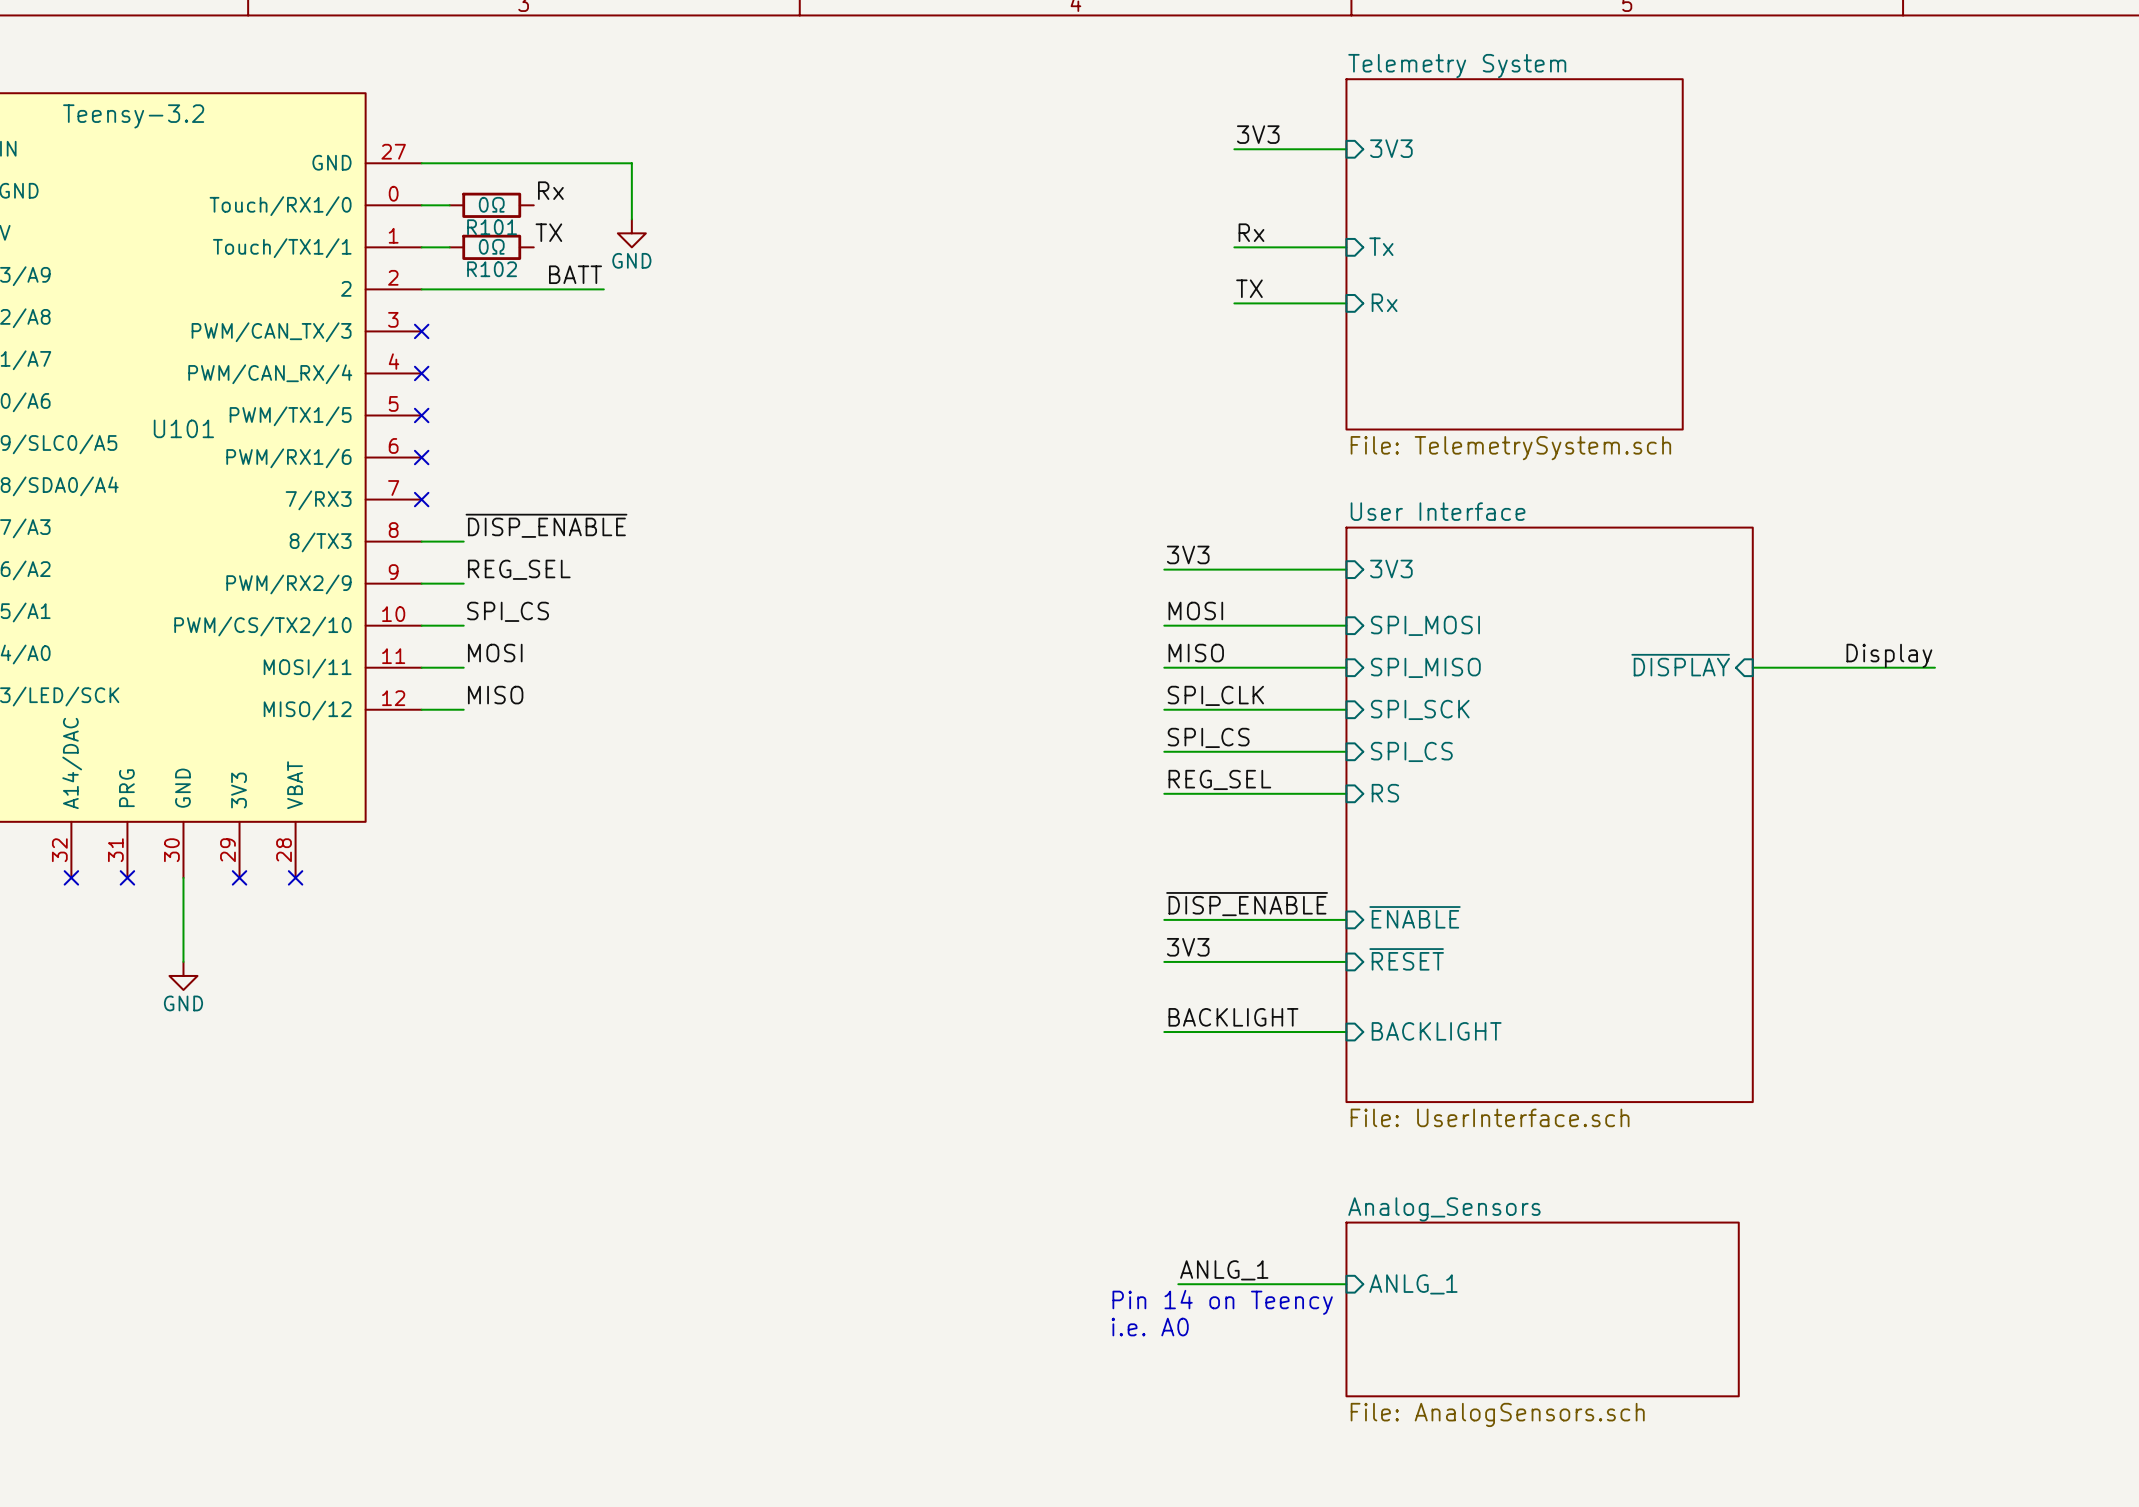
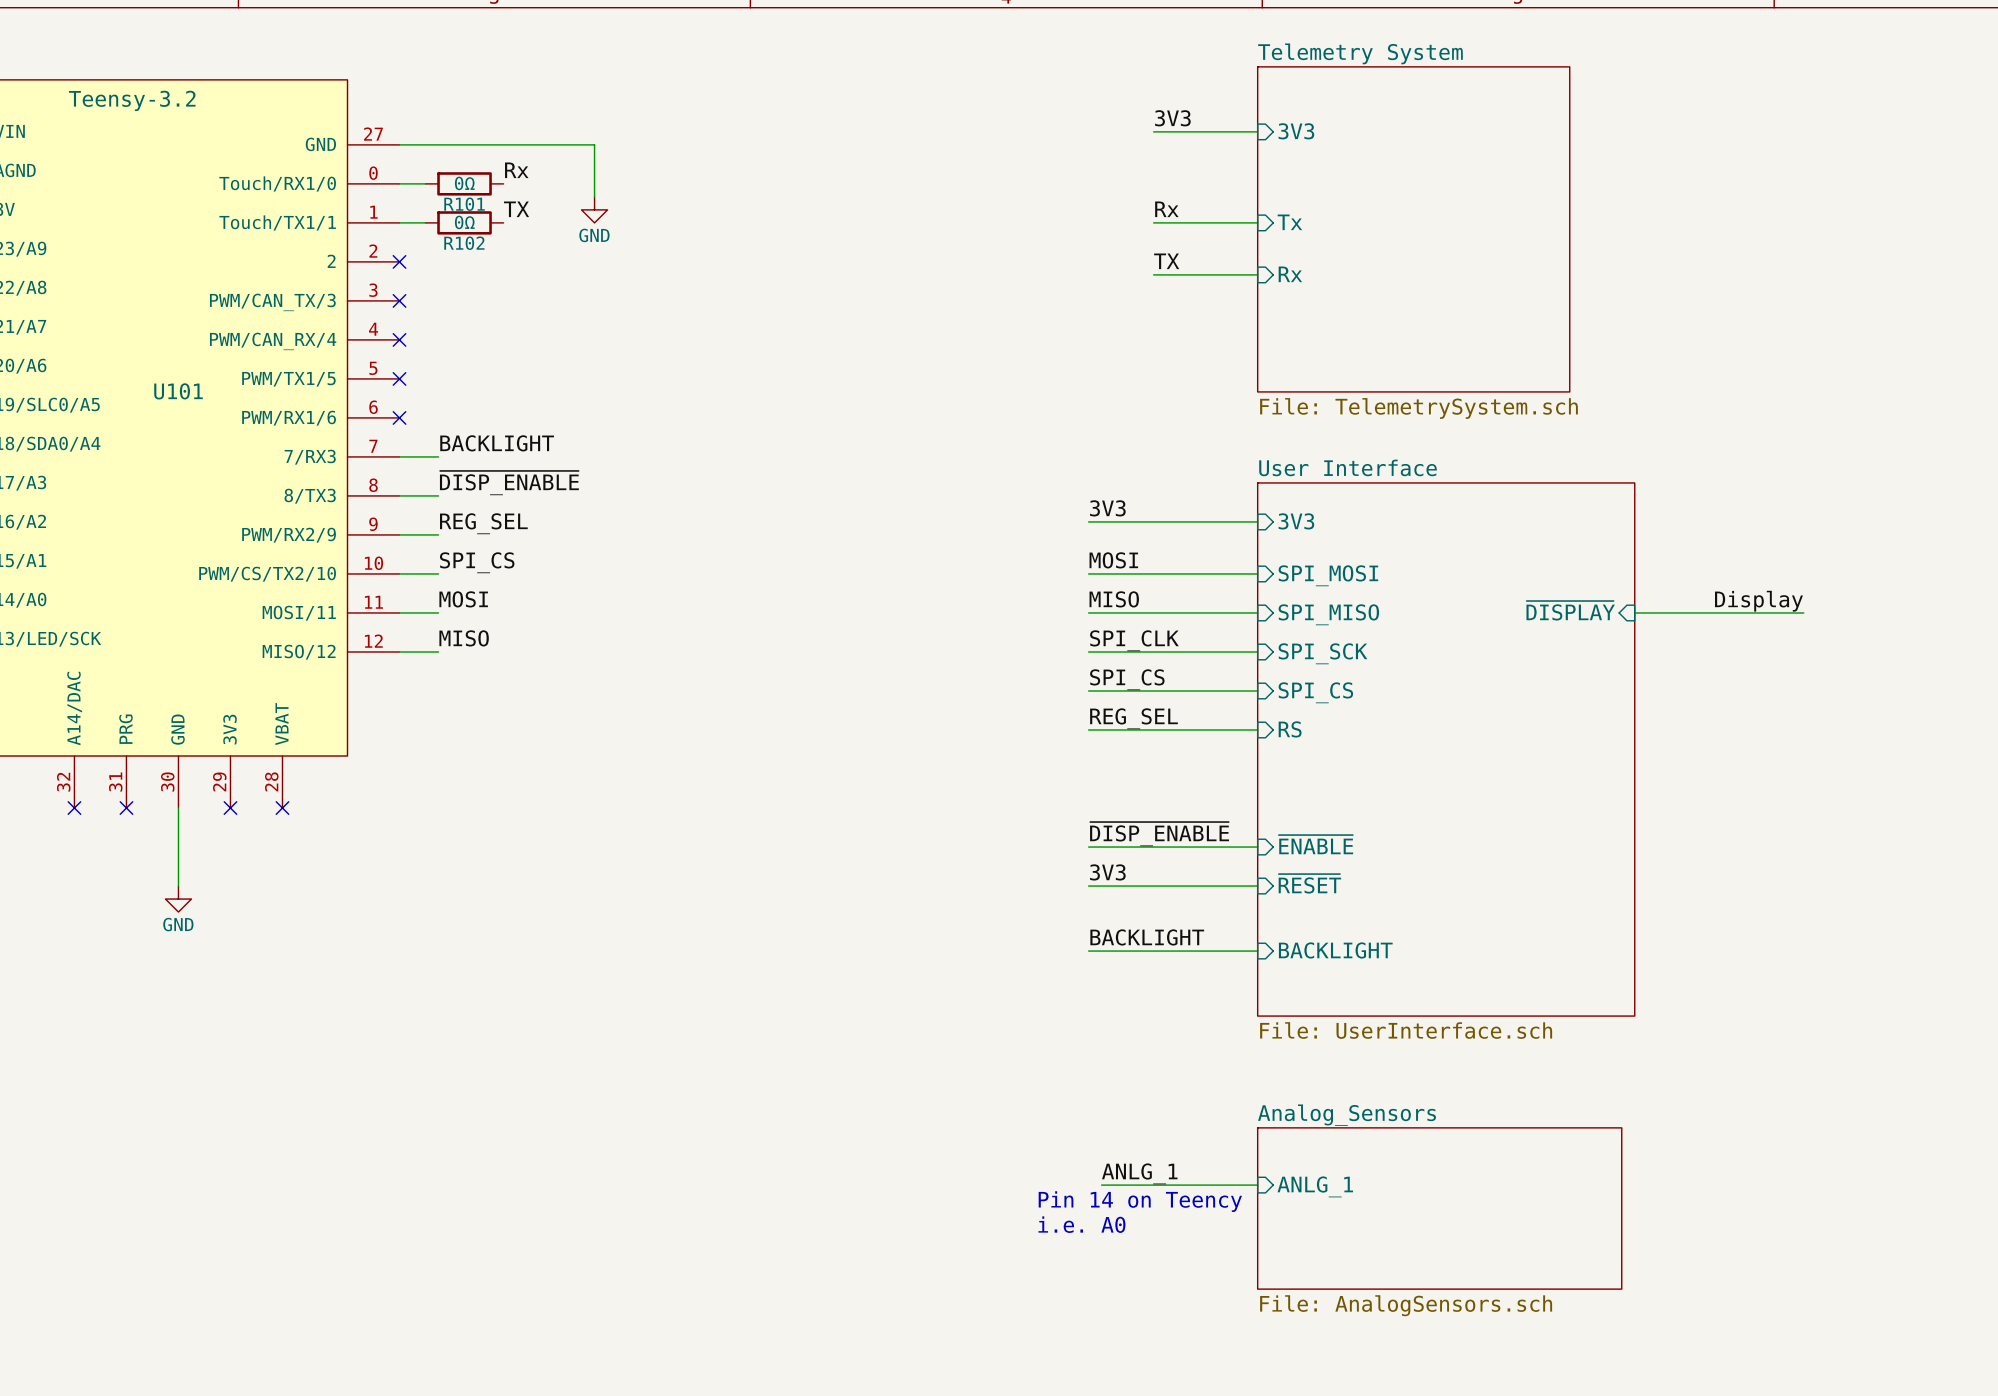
label: BATT (575, 274) -> none
wire: (421, 289) (603, 289) -> none
no-connect mark: none -> (399, 261)
label: none -> BACKLIGHT (497, 443)
wire: none -> (399, 456) (438, 456)
no-connect mark: (421, 499) -> none

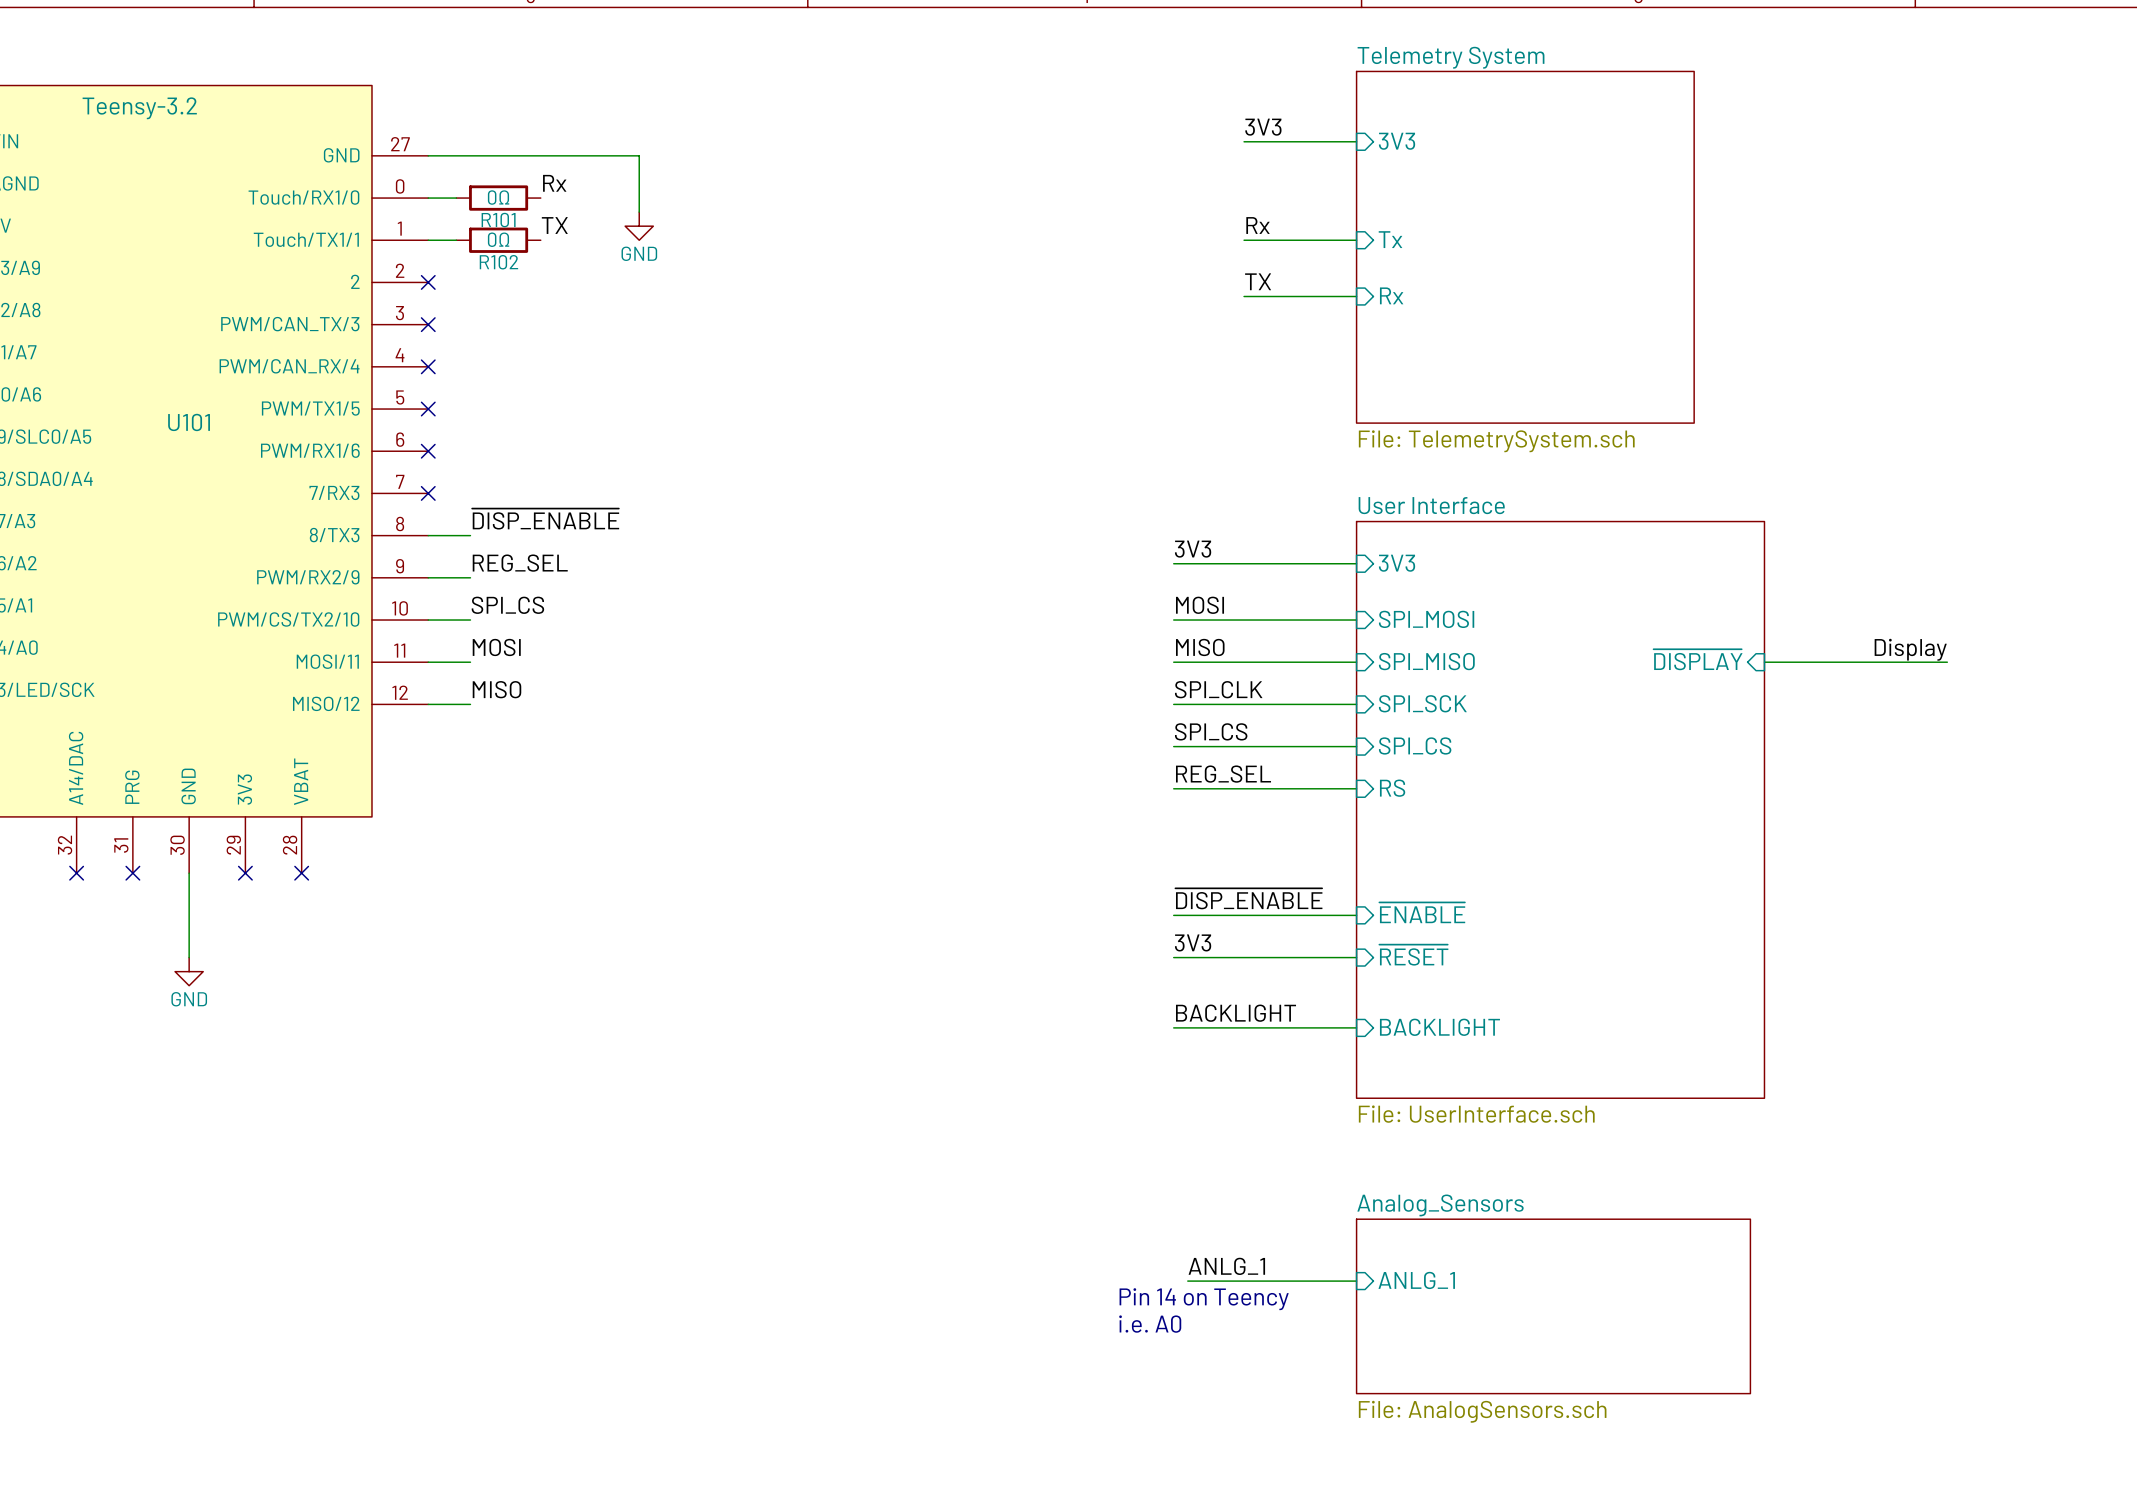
label: BACKLIGHT (497, 443) -> none
wire: (399, 456) (438, 456) -> none
no-connect mark: none -> (428, 493)

